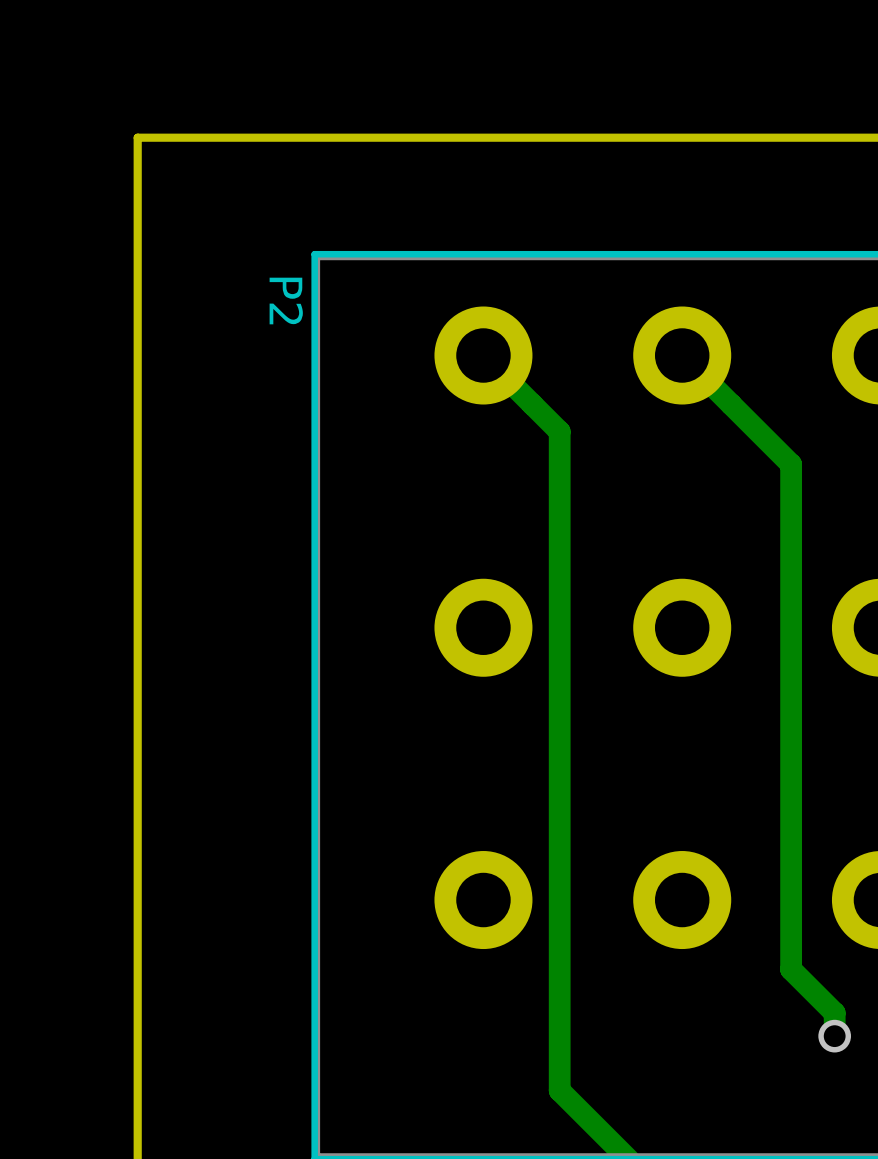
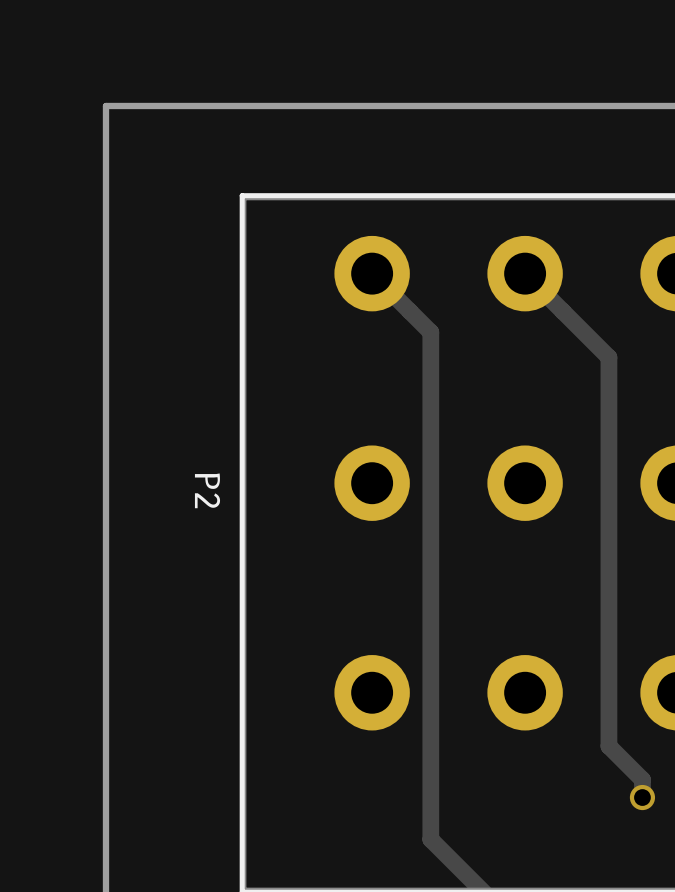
P2 name position: P2 (286, 301) -> P2 (207, 490)

